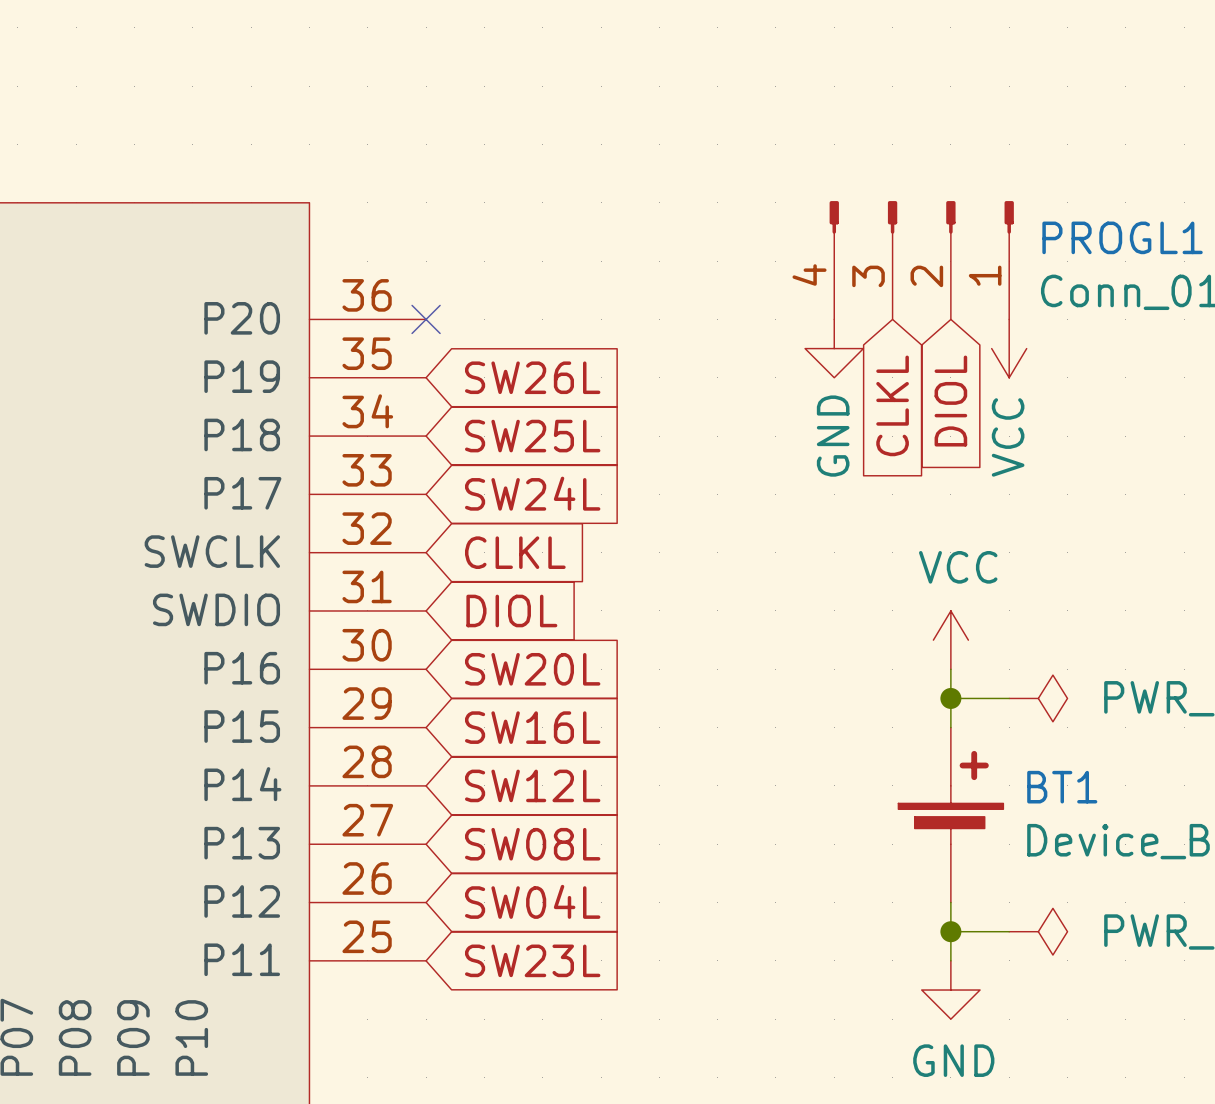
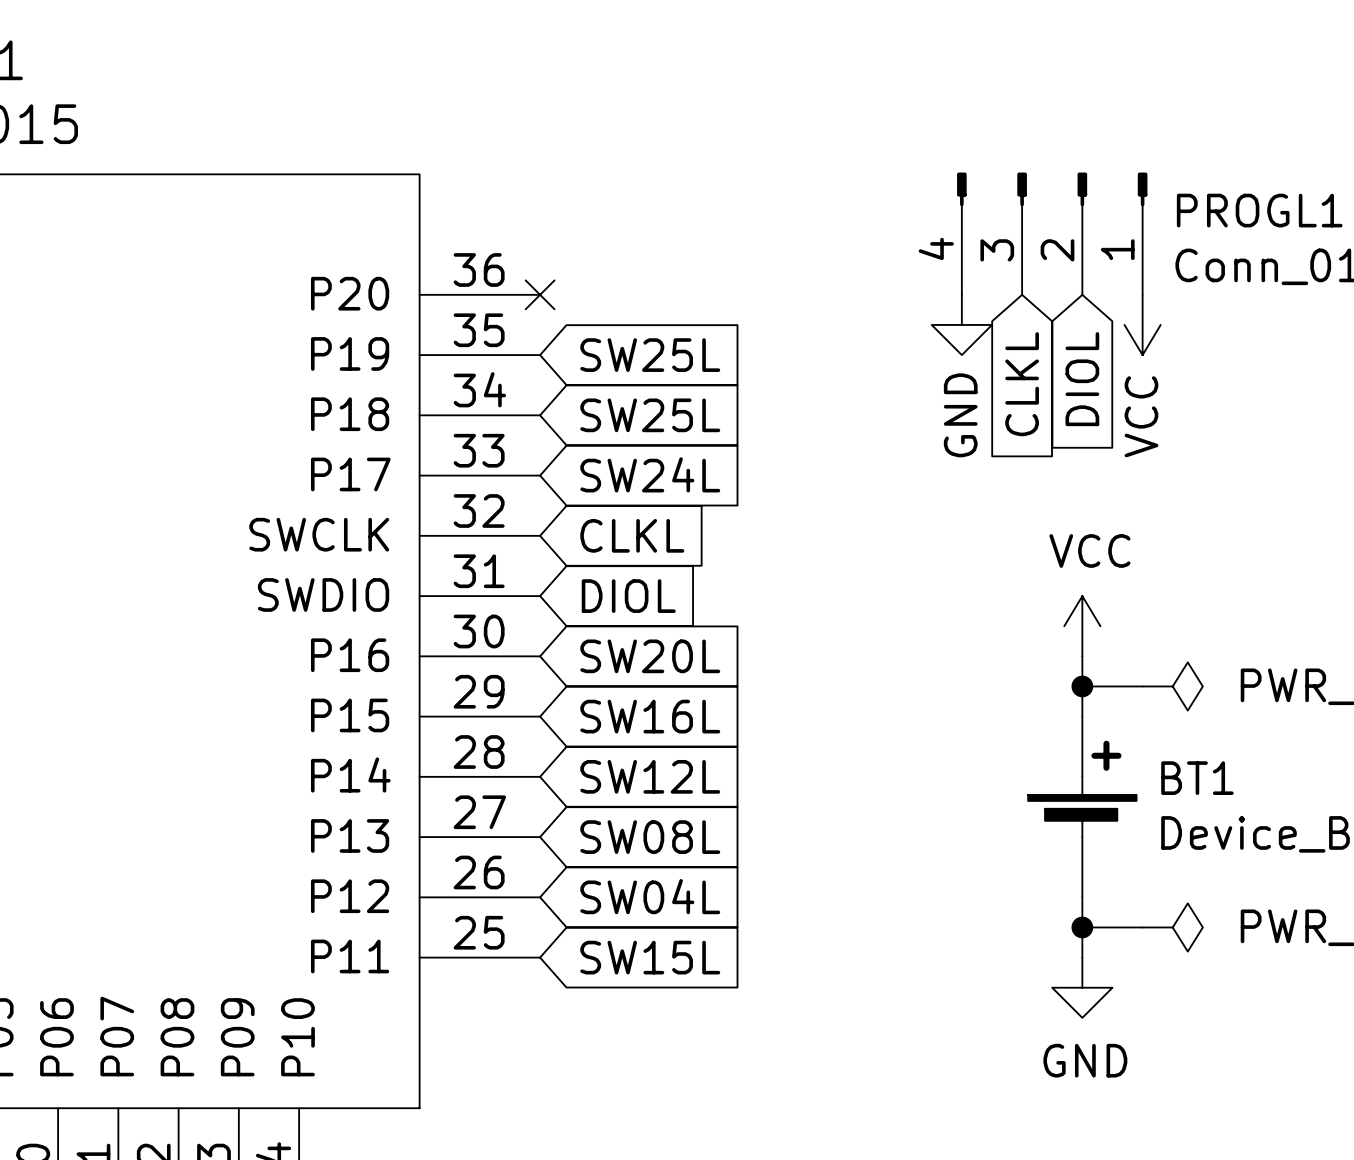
global label: SW26L (532, 377) -> SW25L (650, 355)
global label: SW23L (532, 960) -> SW15L (650, 957)

